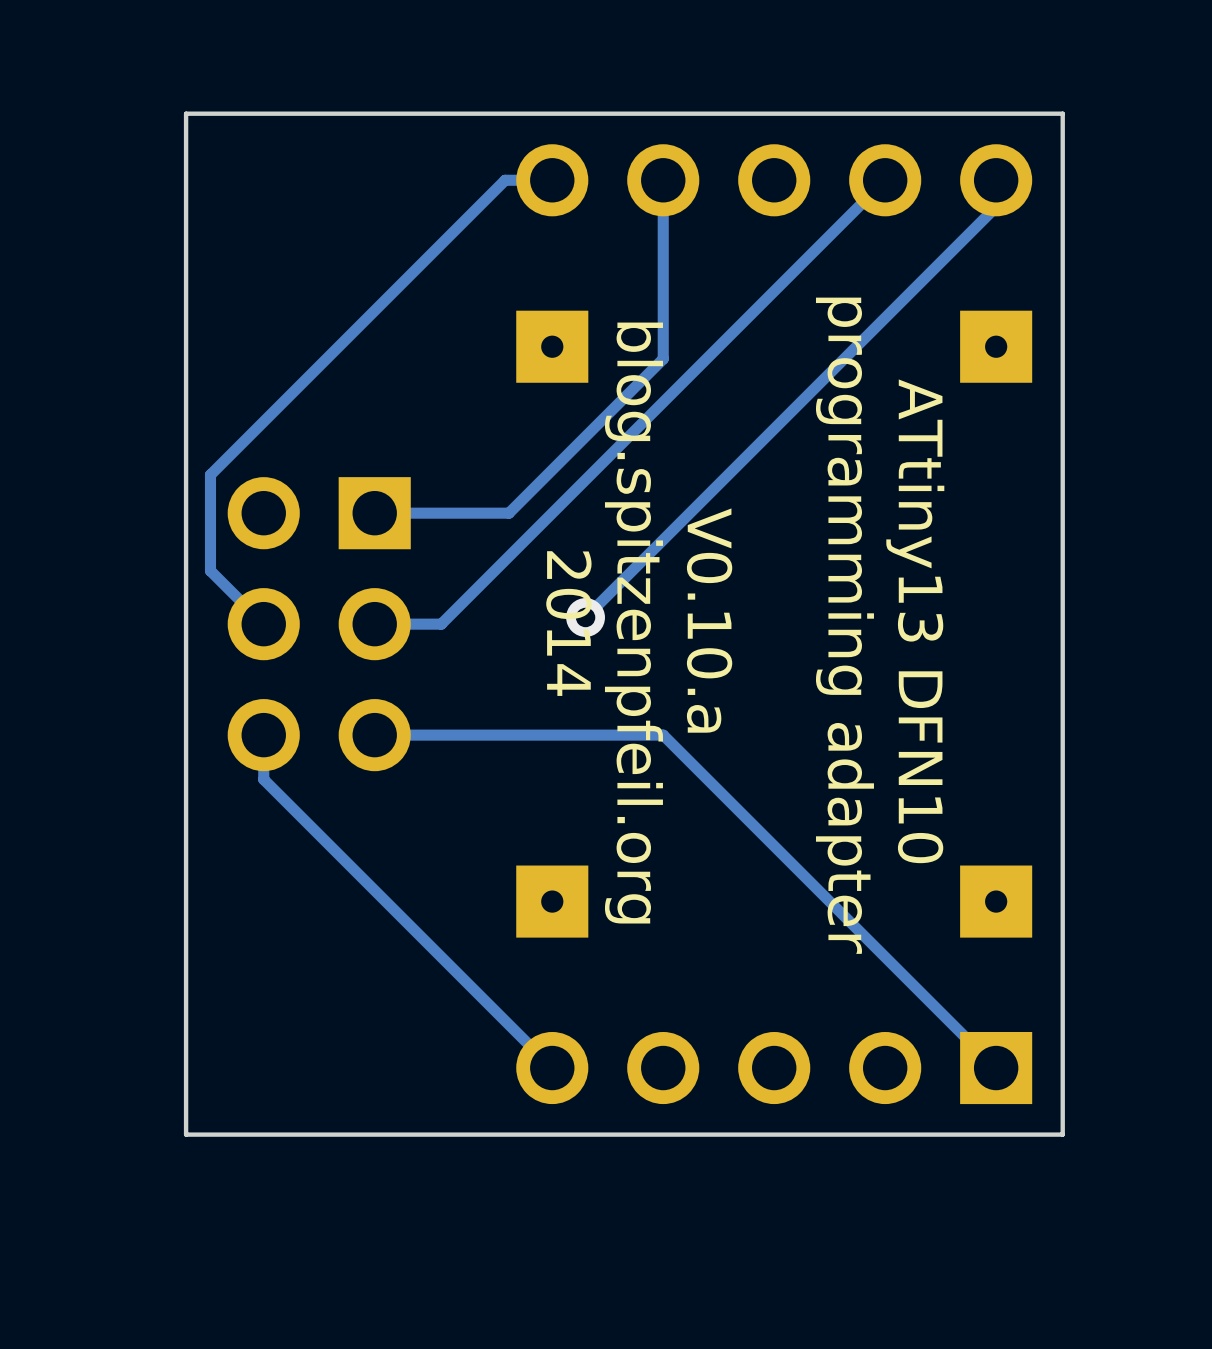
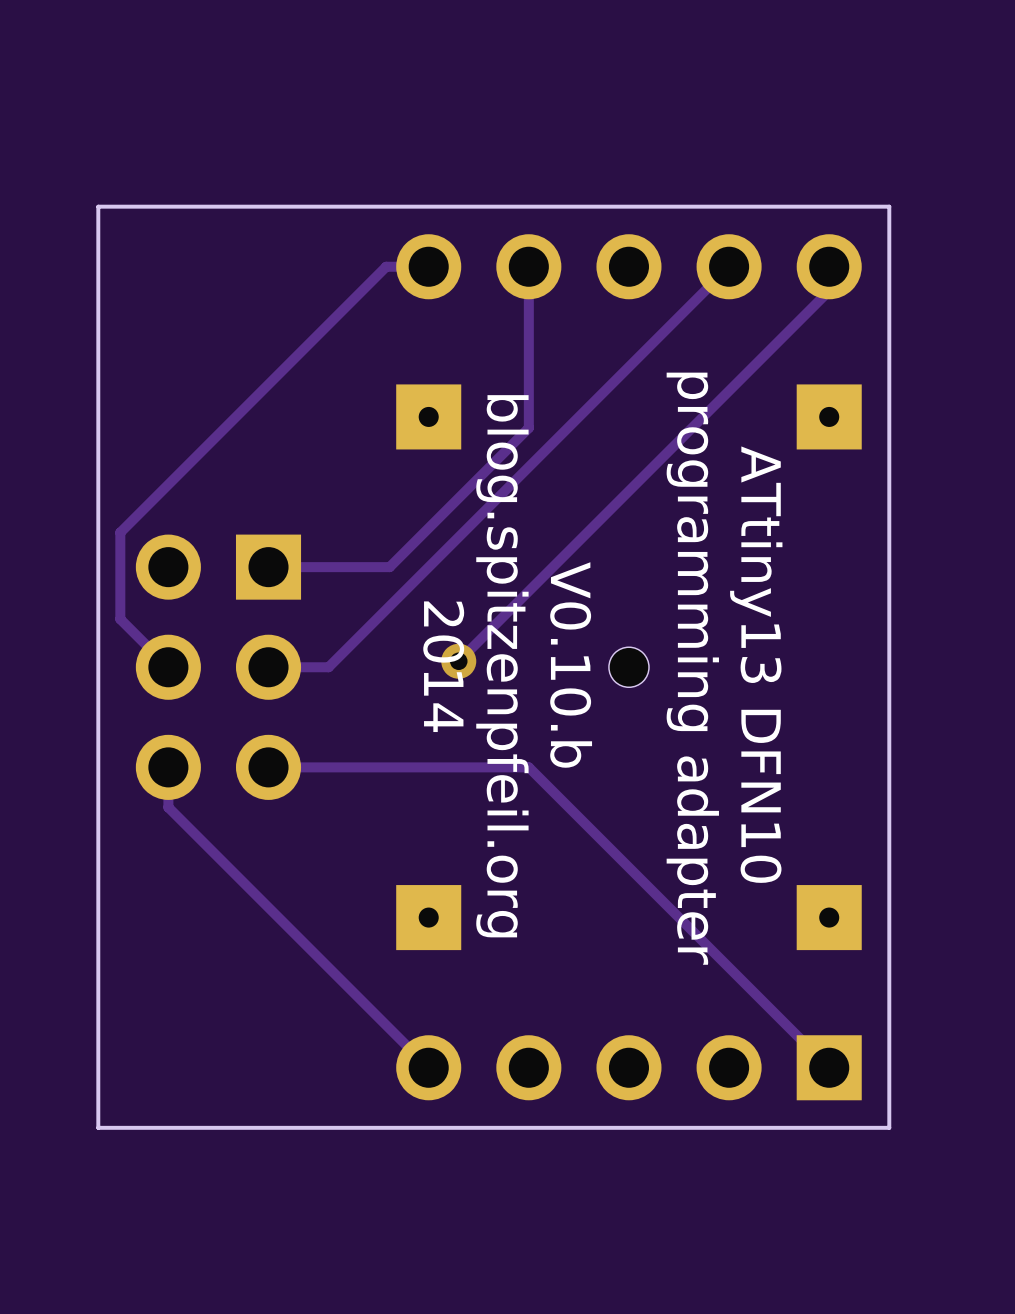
text: V0.10.a (709, 620) -> V0.10.b (571, 664)
part: none -> (628, 667)

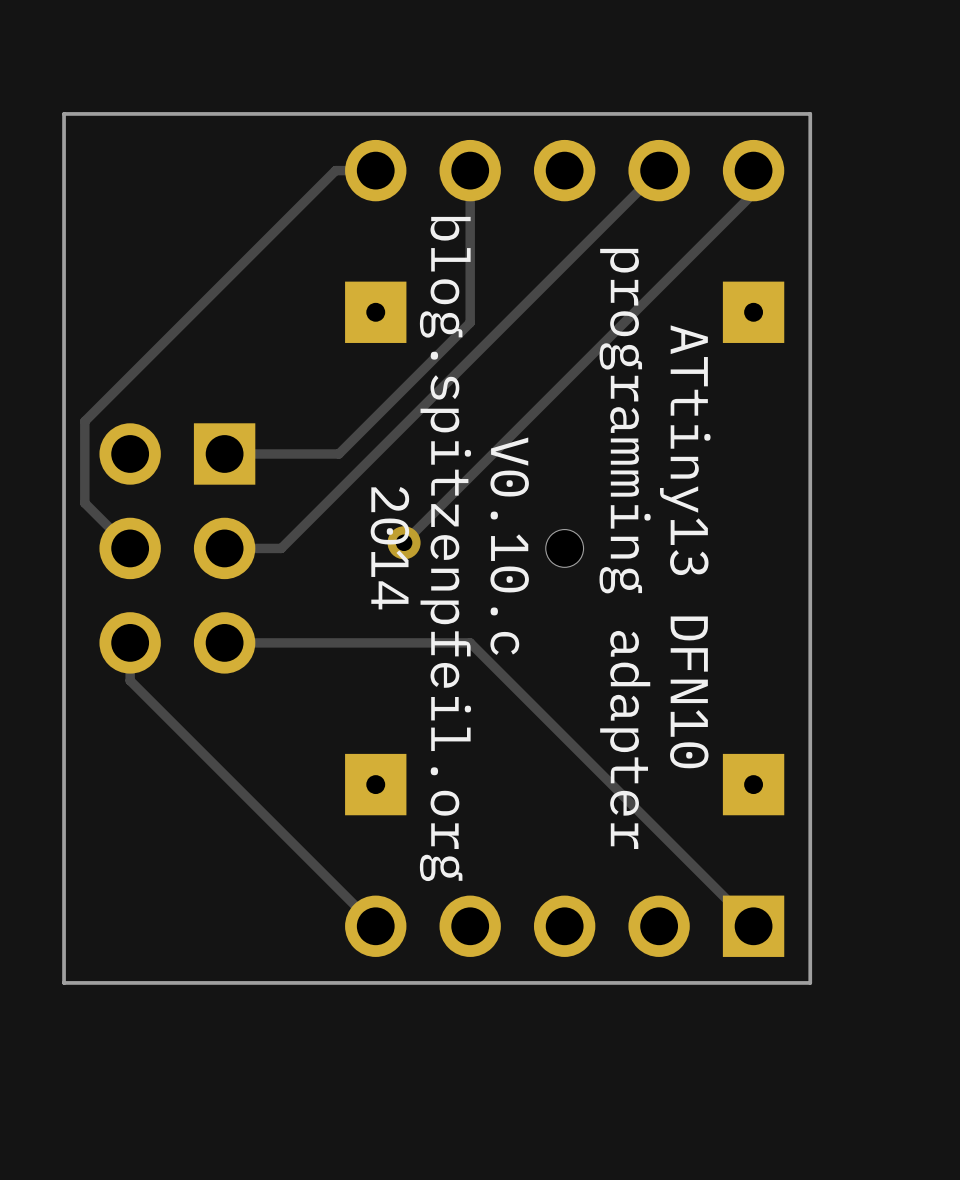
text: V0.10.b (571, 664) -> V0.10.c (509, 546)

